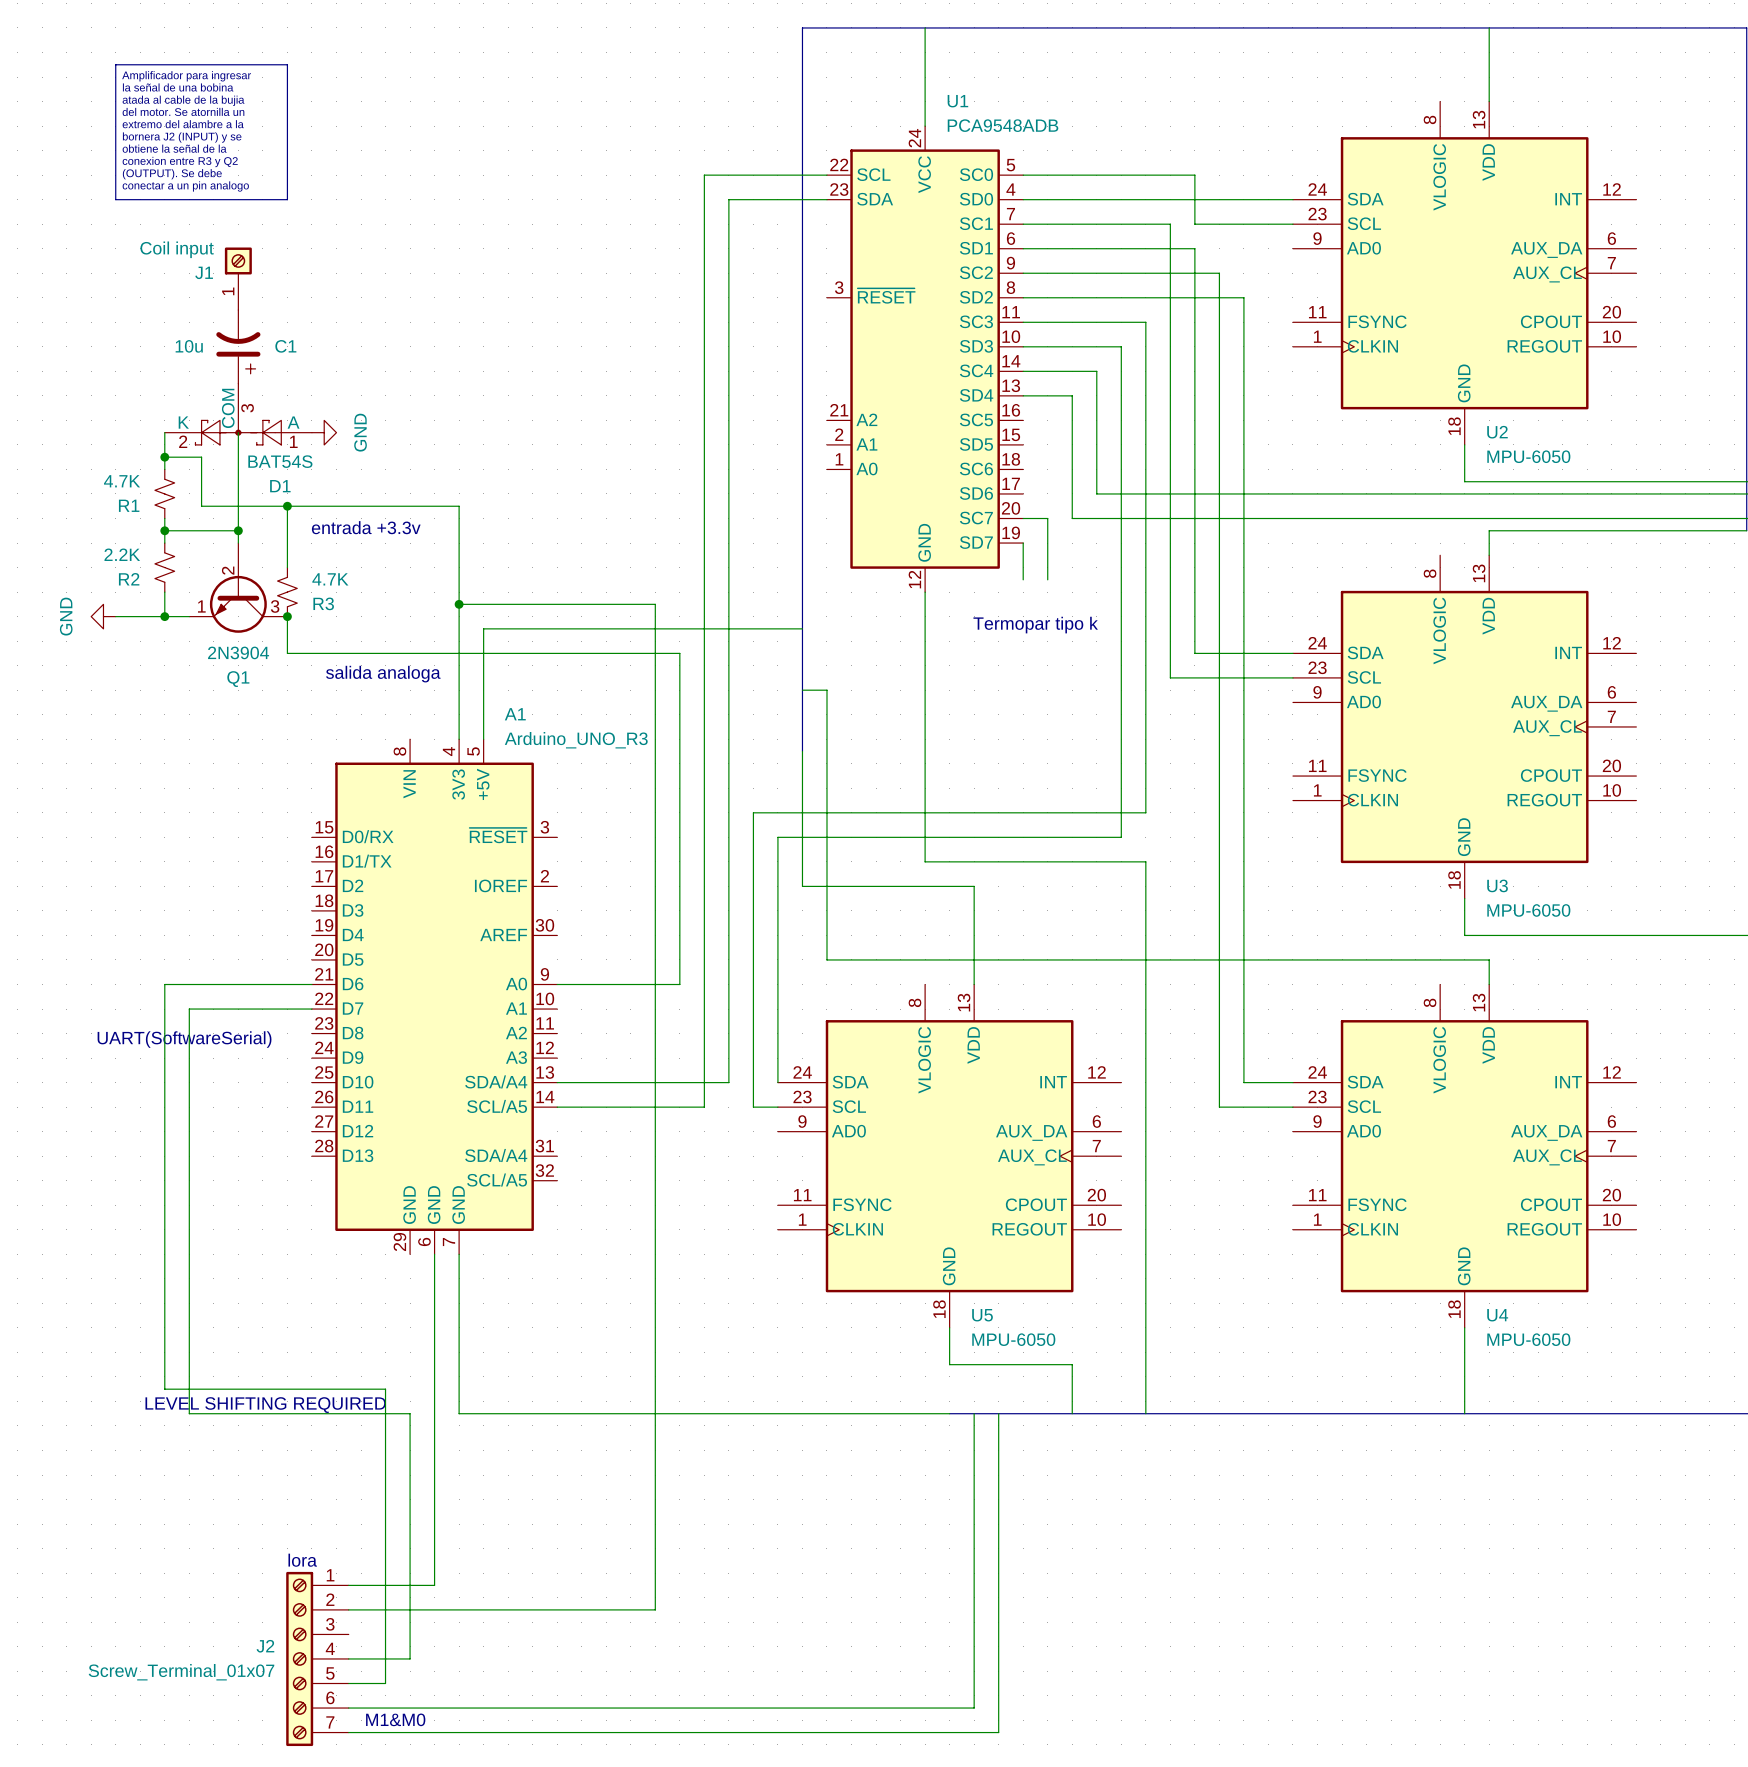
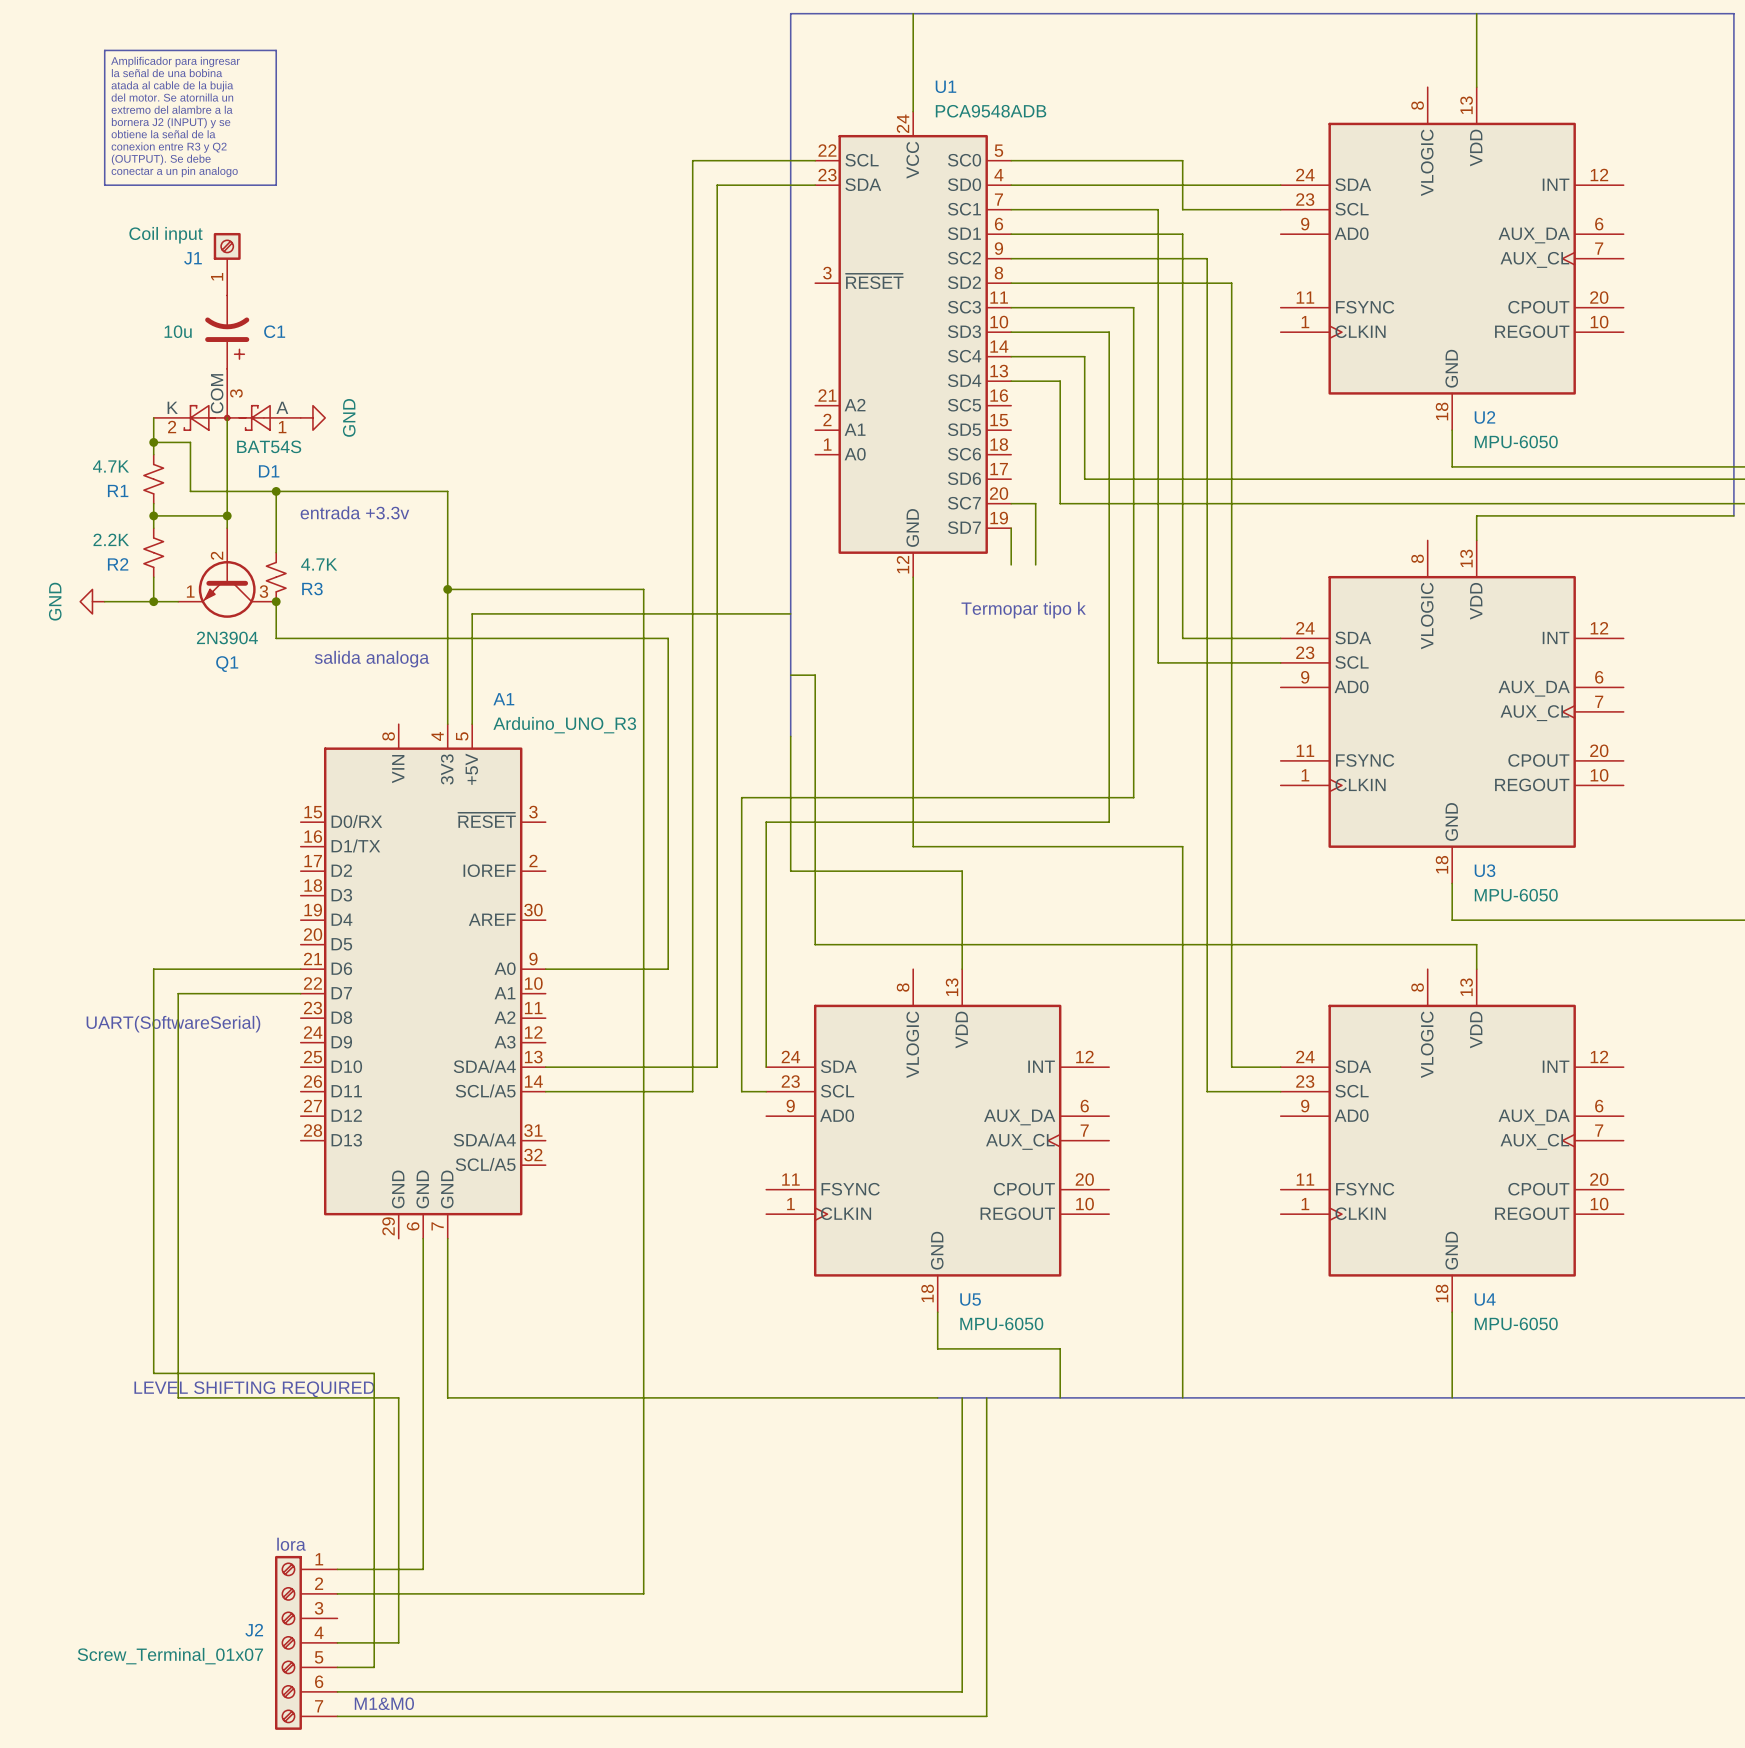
wire: (1145, 861) (1145, 1413) -> (1133, 846) (1182, 846) (1182, 1397)

